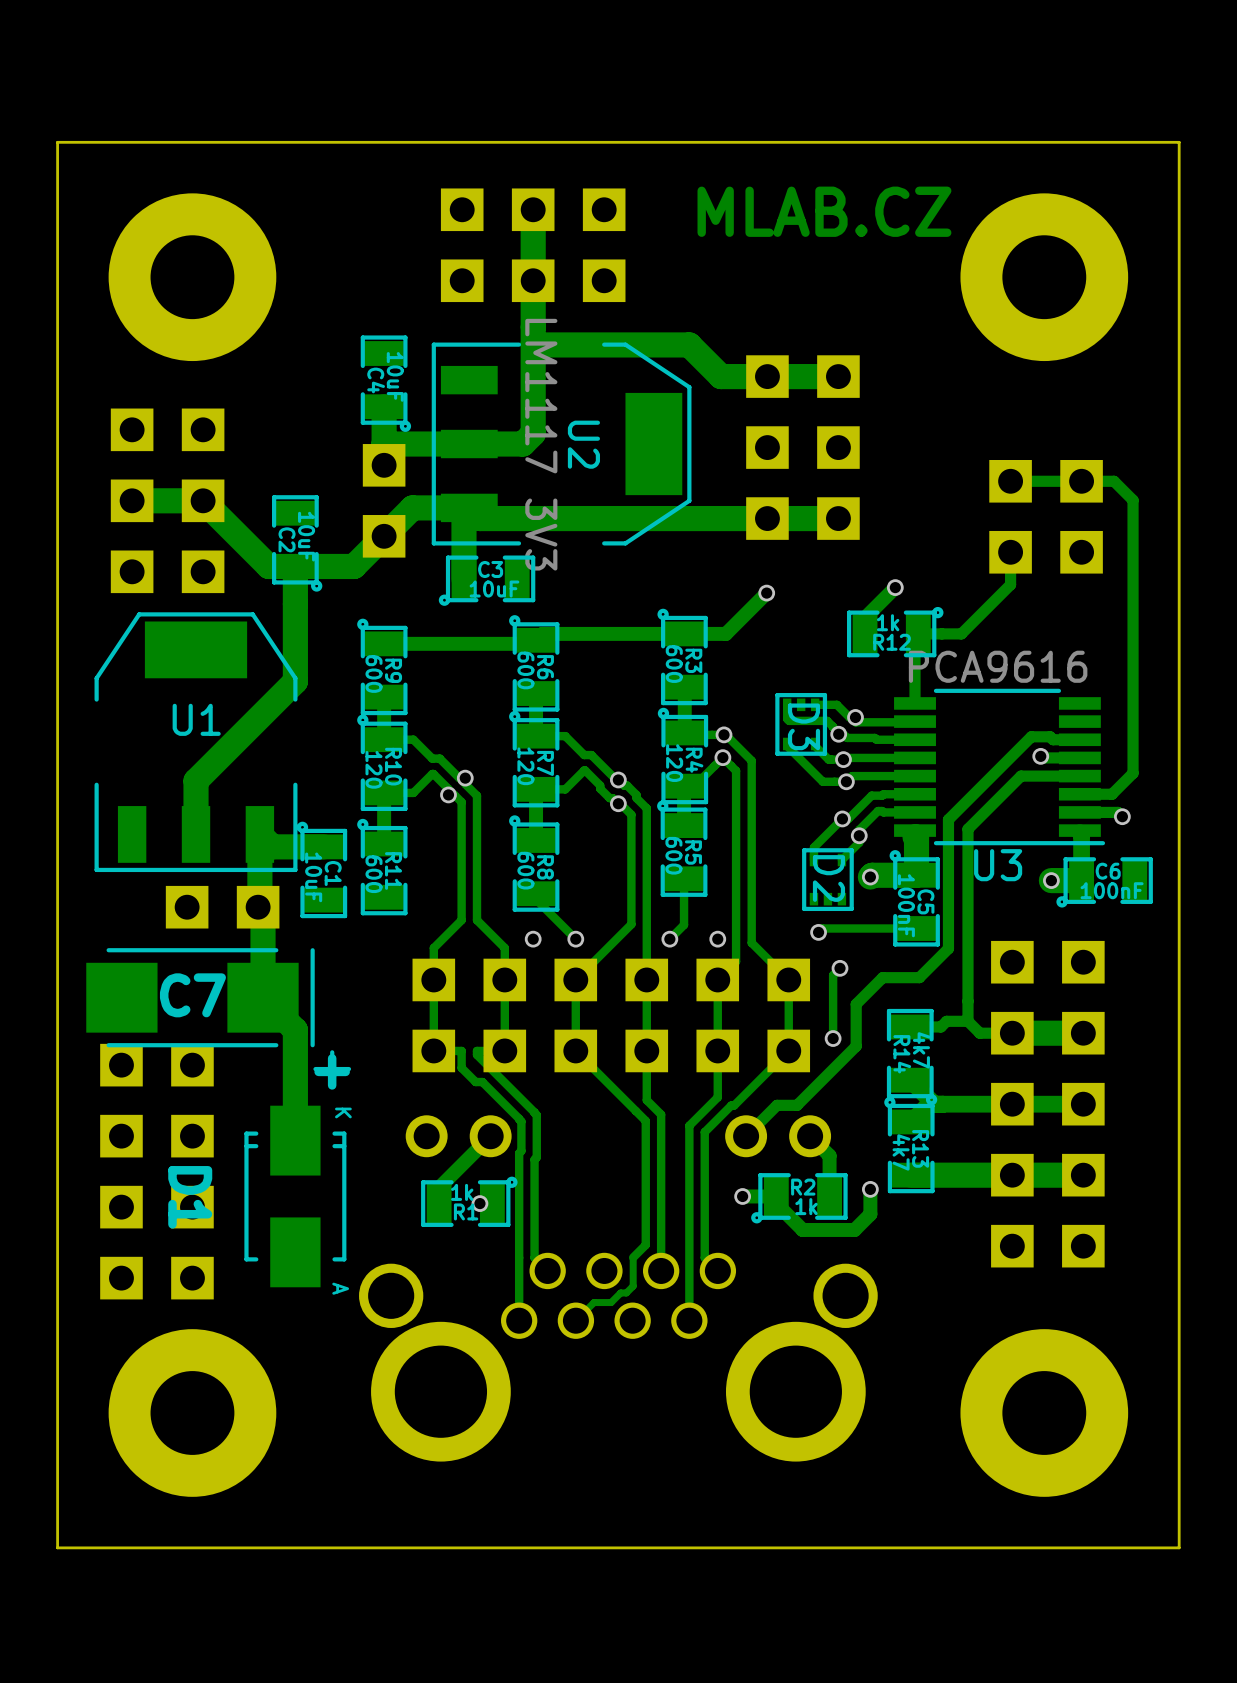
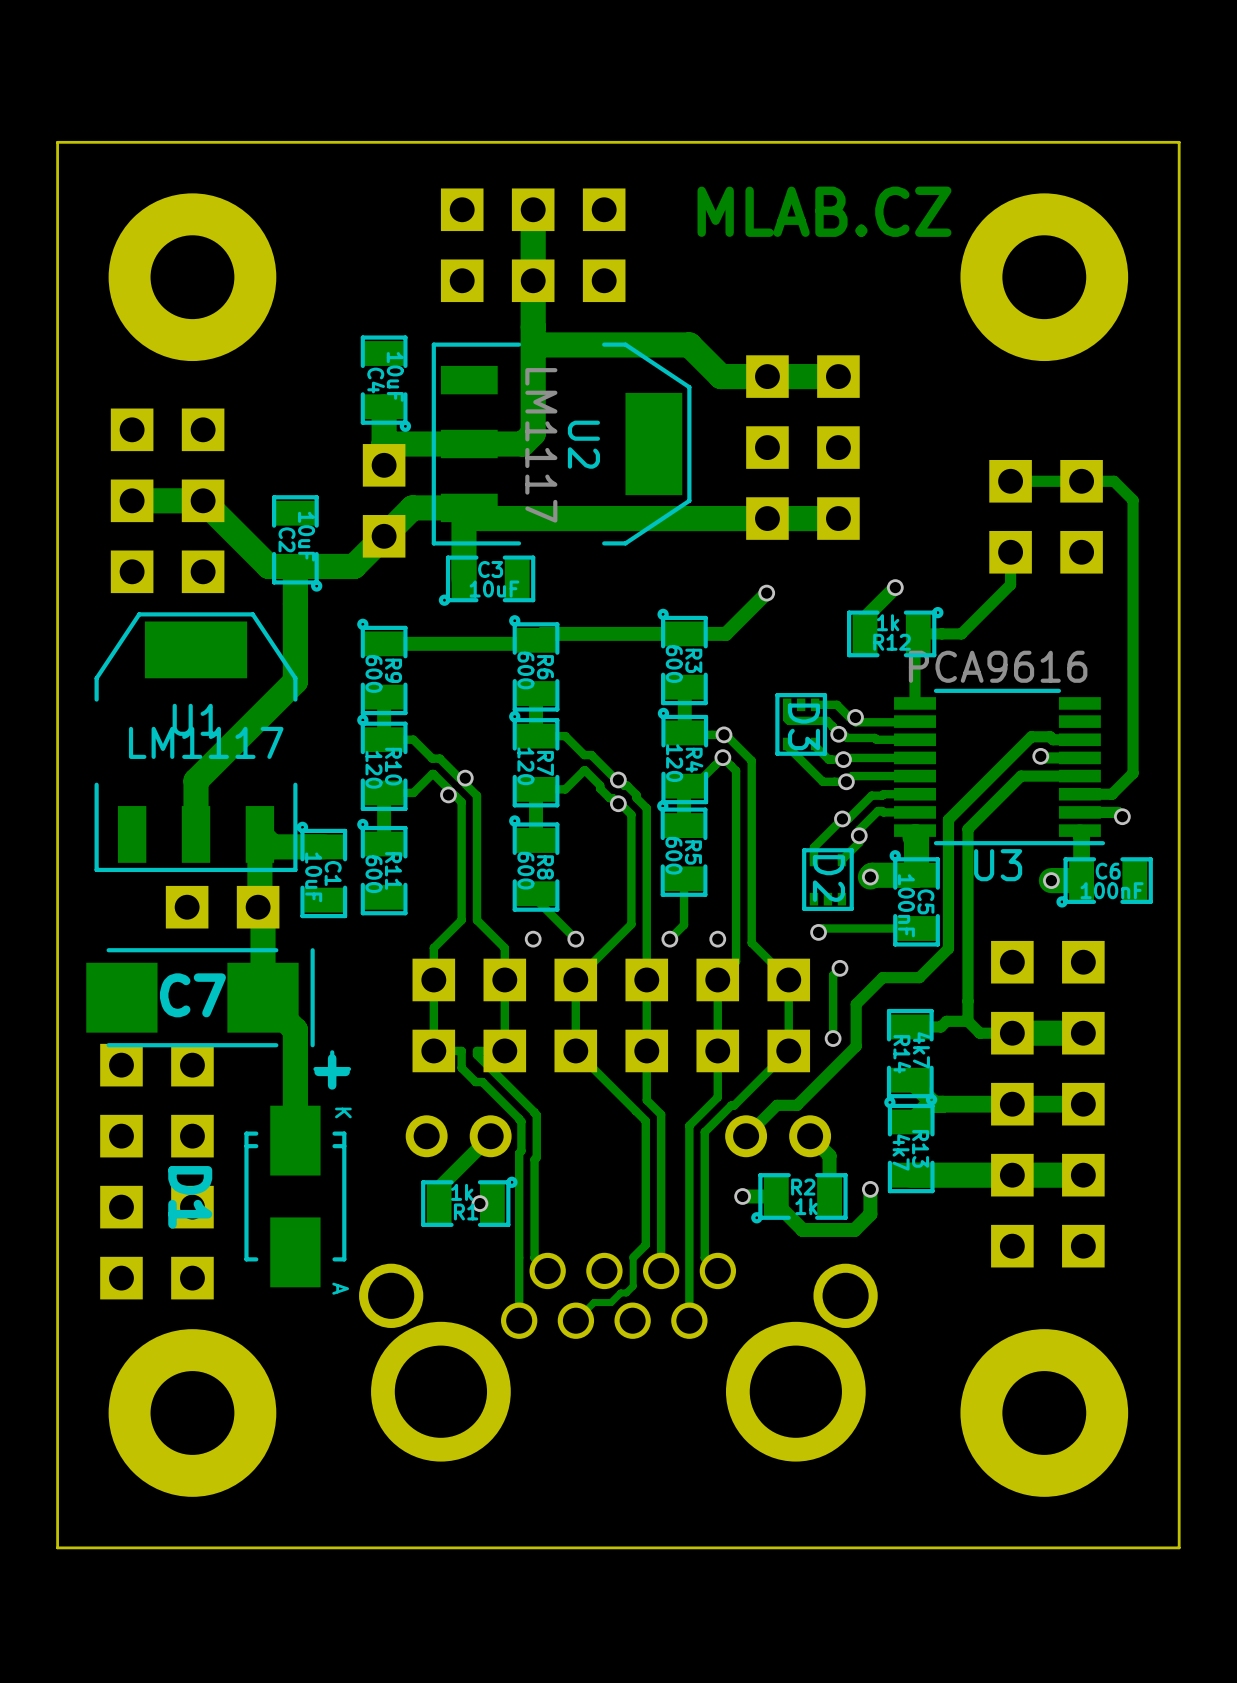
U2 value: LM1117 3V3 (541, 444) -> LM1117 (541, 445)
U1 value: none -> LM1117 (206, 742)

